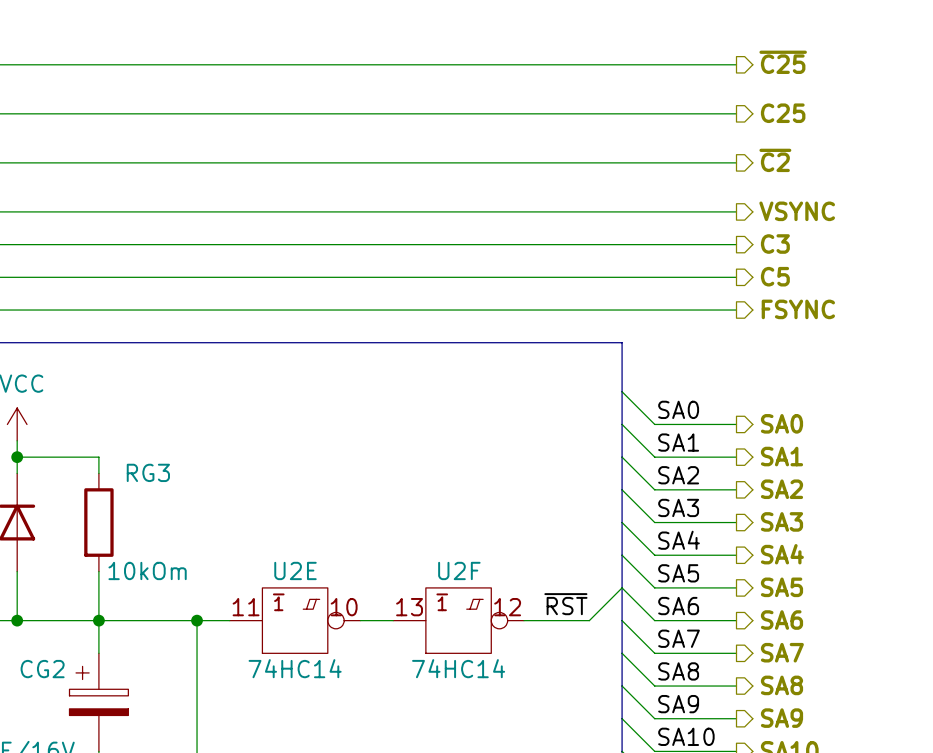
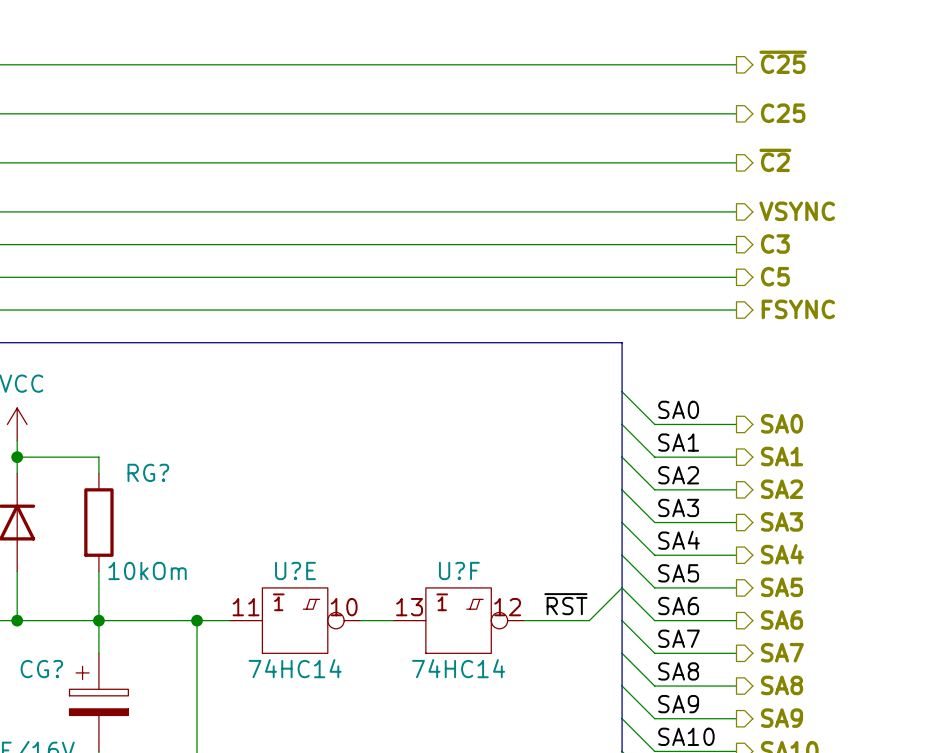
RG3 name: RG3 (148, 472) -> RG? (148, 472)
U2E name: U2E (295, 570) -> U?E (295, 570)
U2F name: U2F (459, 570) -> U?F (459, 570)
CG2 name: CG2 (42, 669) -> CG? (41, 669)

